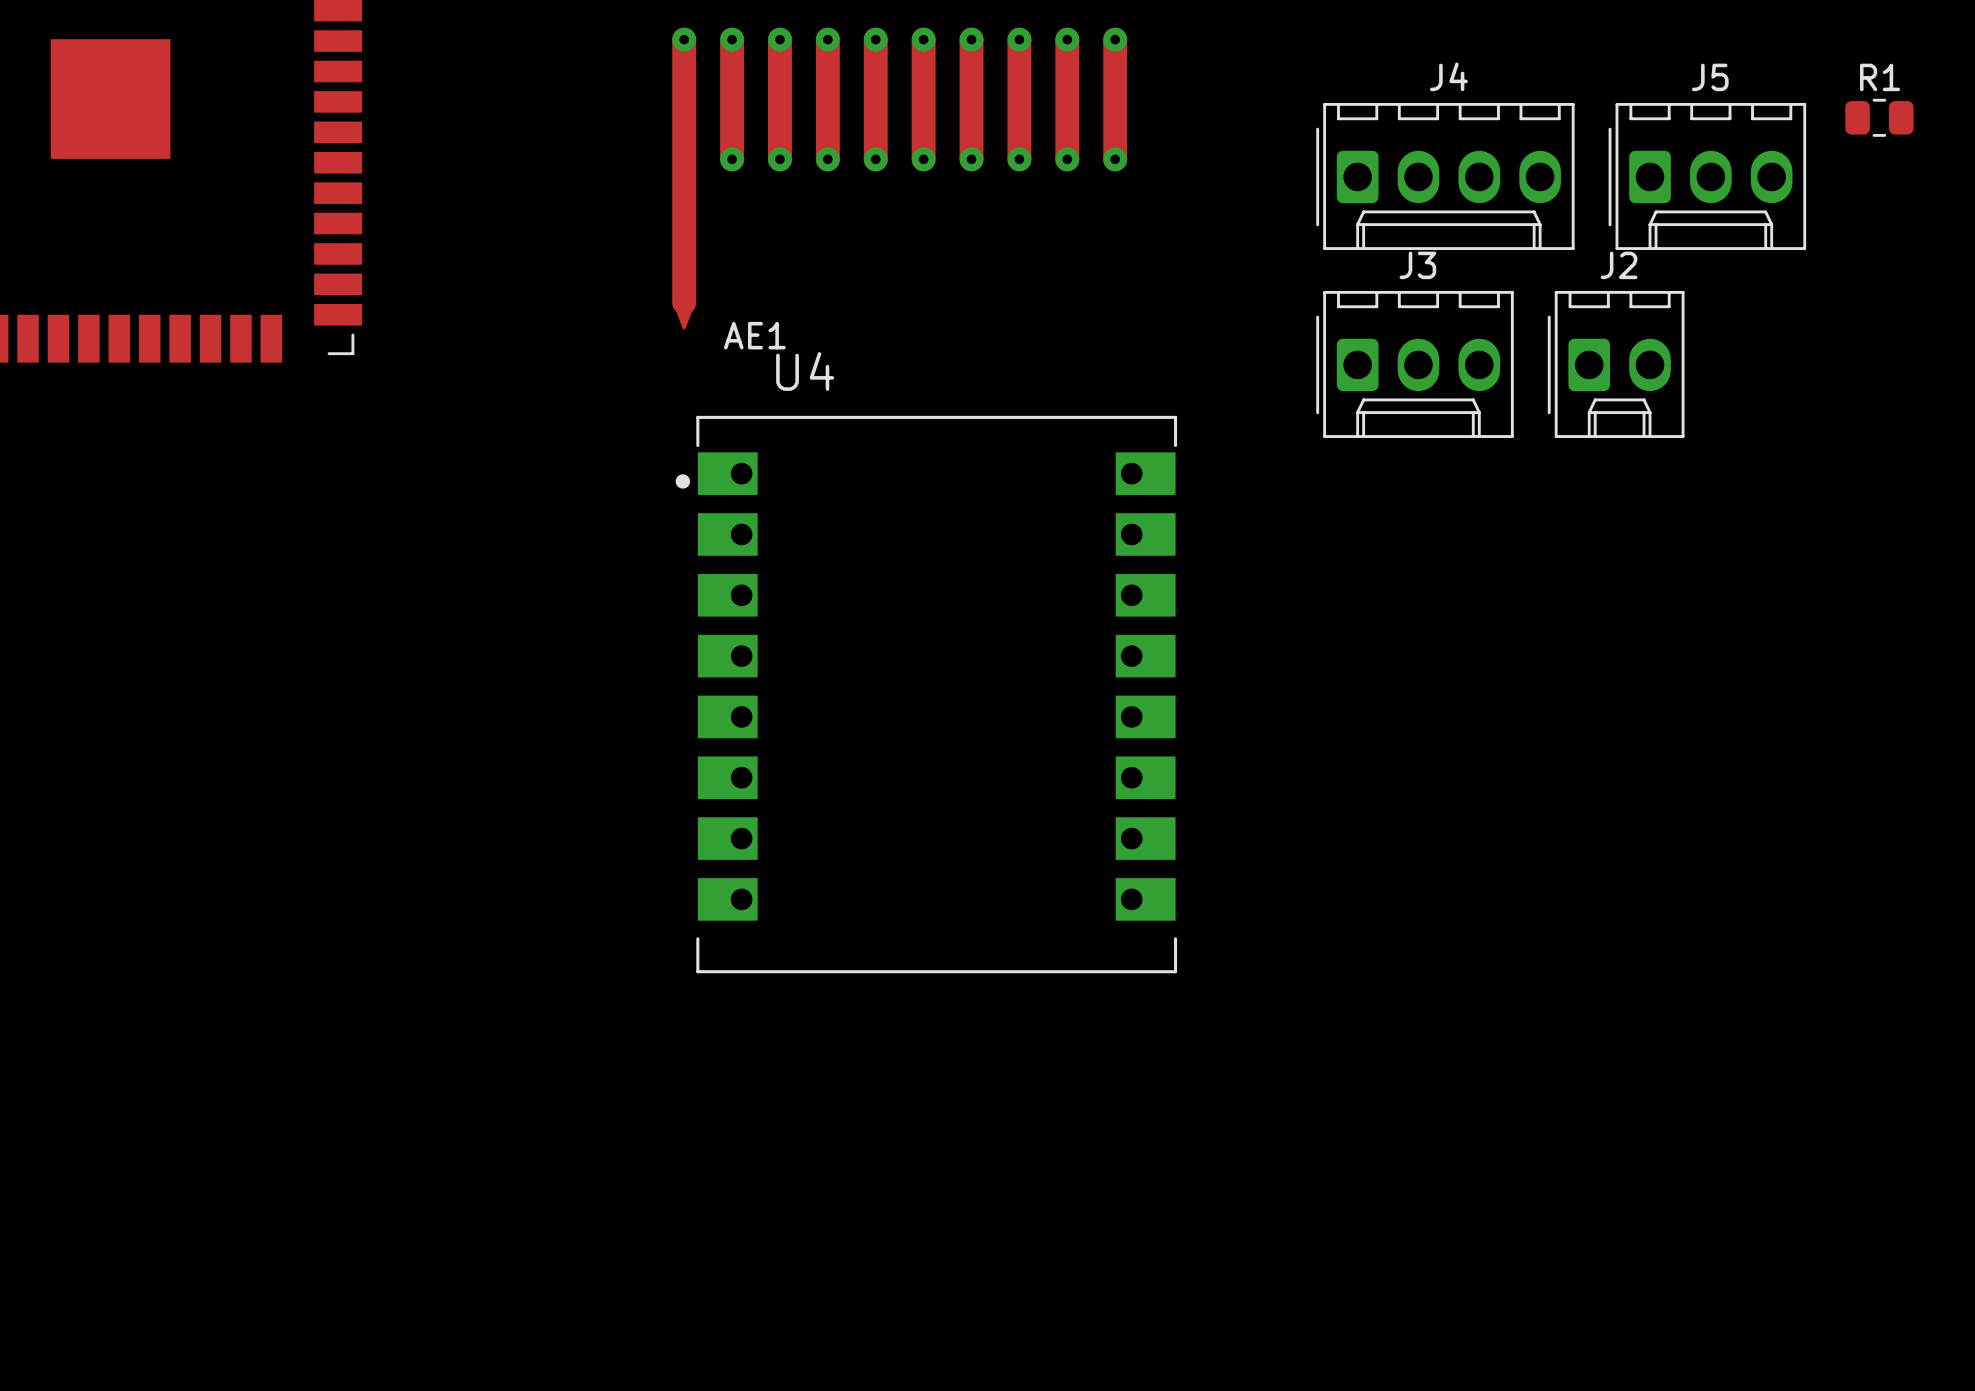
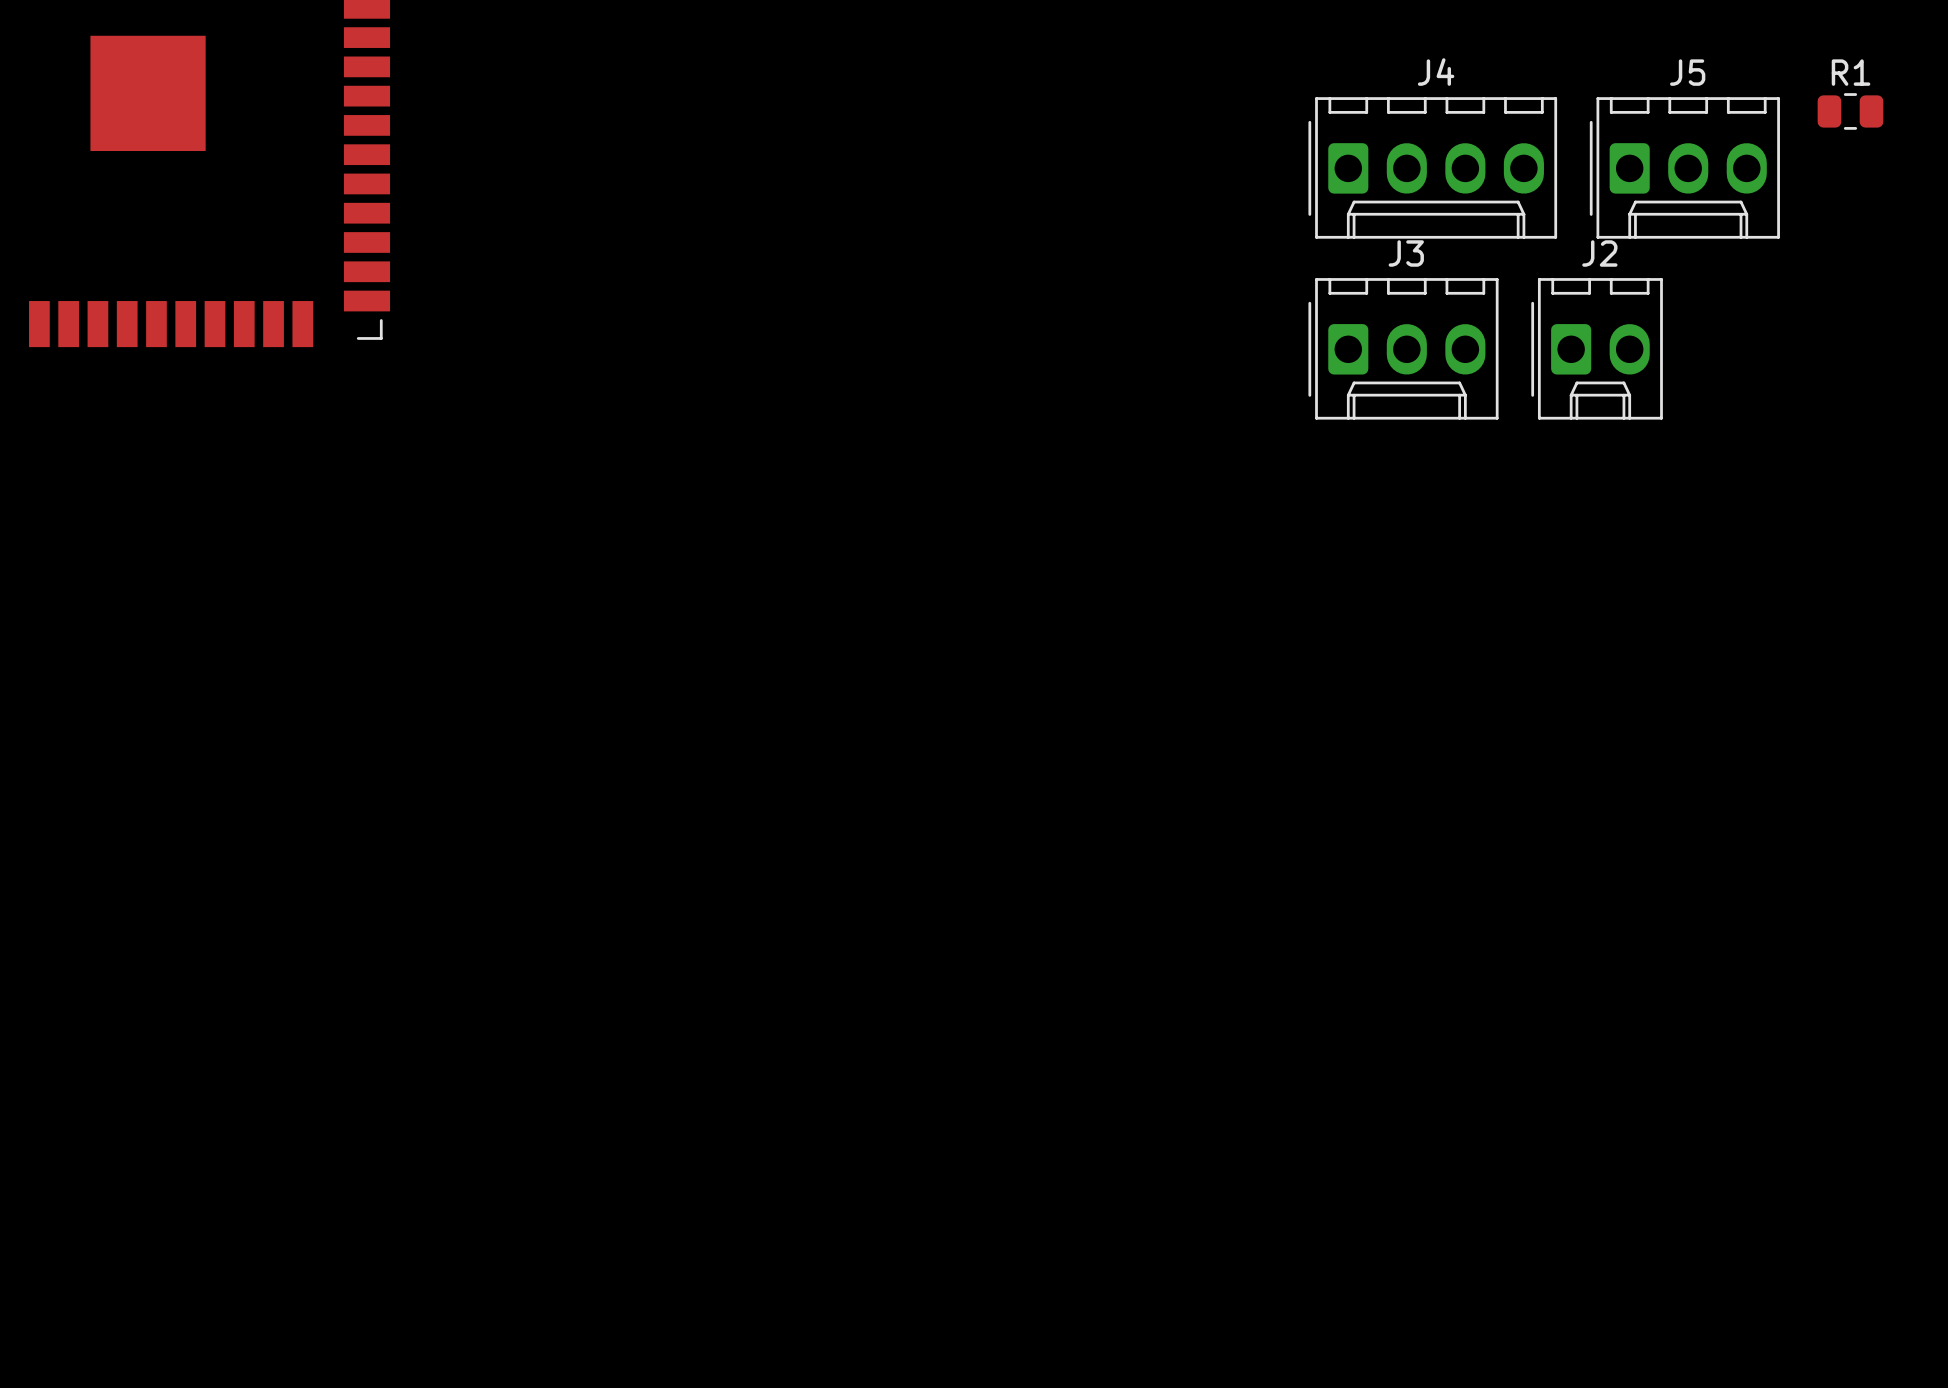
AE1: (899, 178) -> none
U4: (926, 694) -> none

